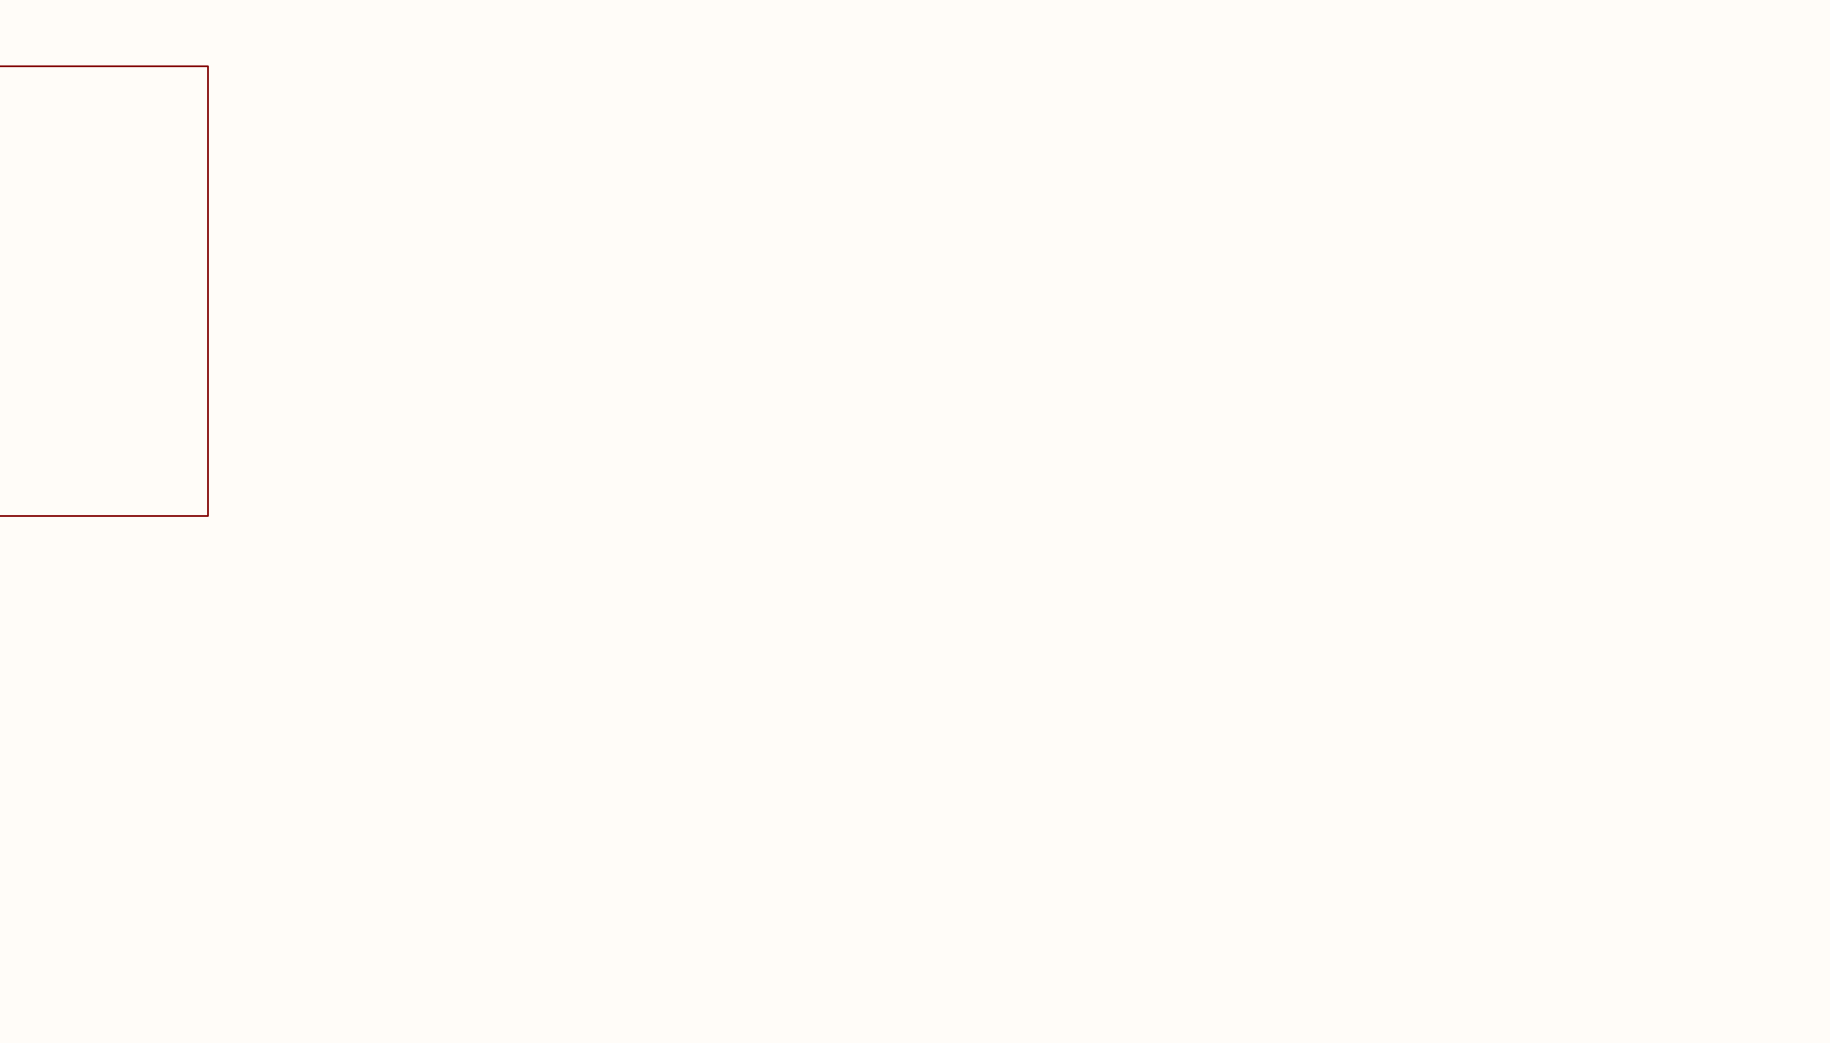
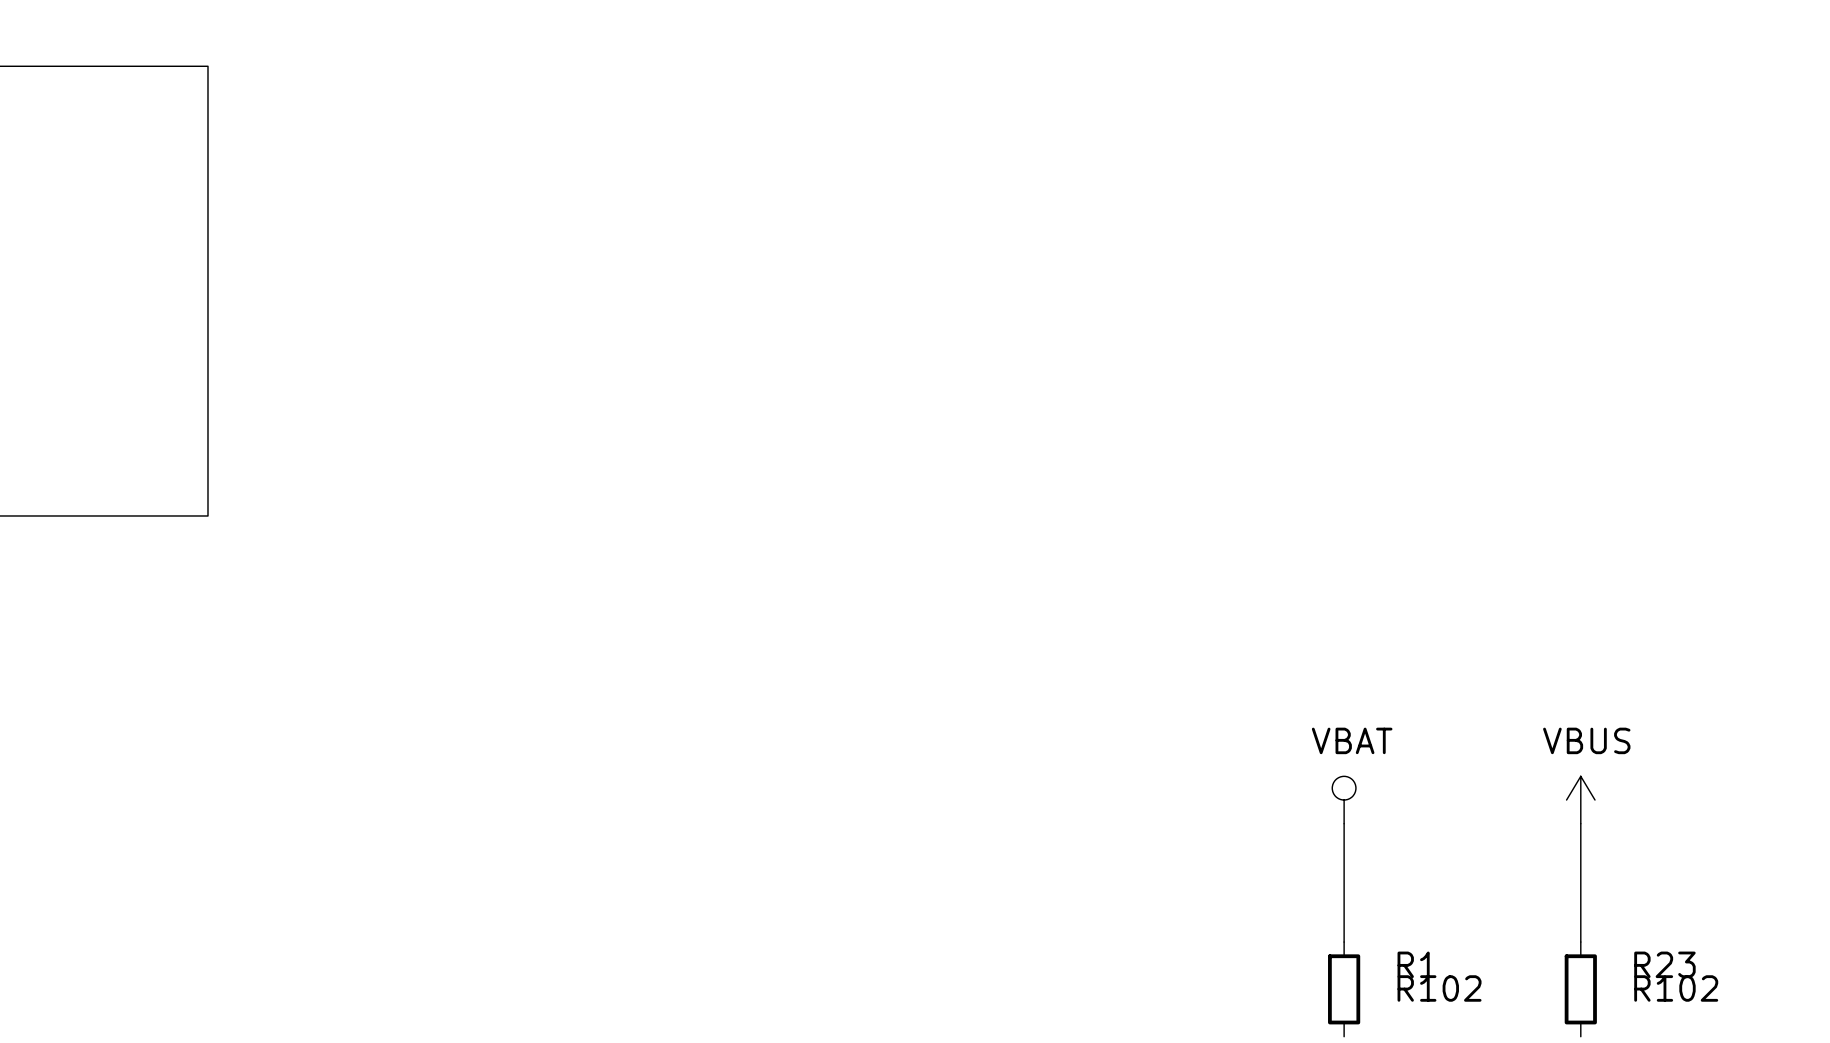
power symbol: none -> VBAT (1344, 800)
power symbol: none -> VBUS (1580, 800)
wire: none -> (1344, 823) (1344, 942)
wire: none -> (1580, 823) (1580, 942)
R1: none -> R102 (1344, 989)
R23: none -> R102 (1580, 989)

